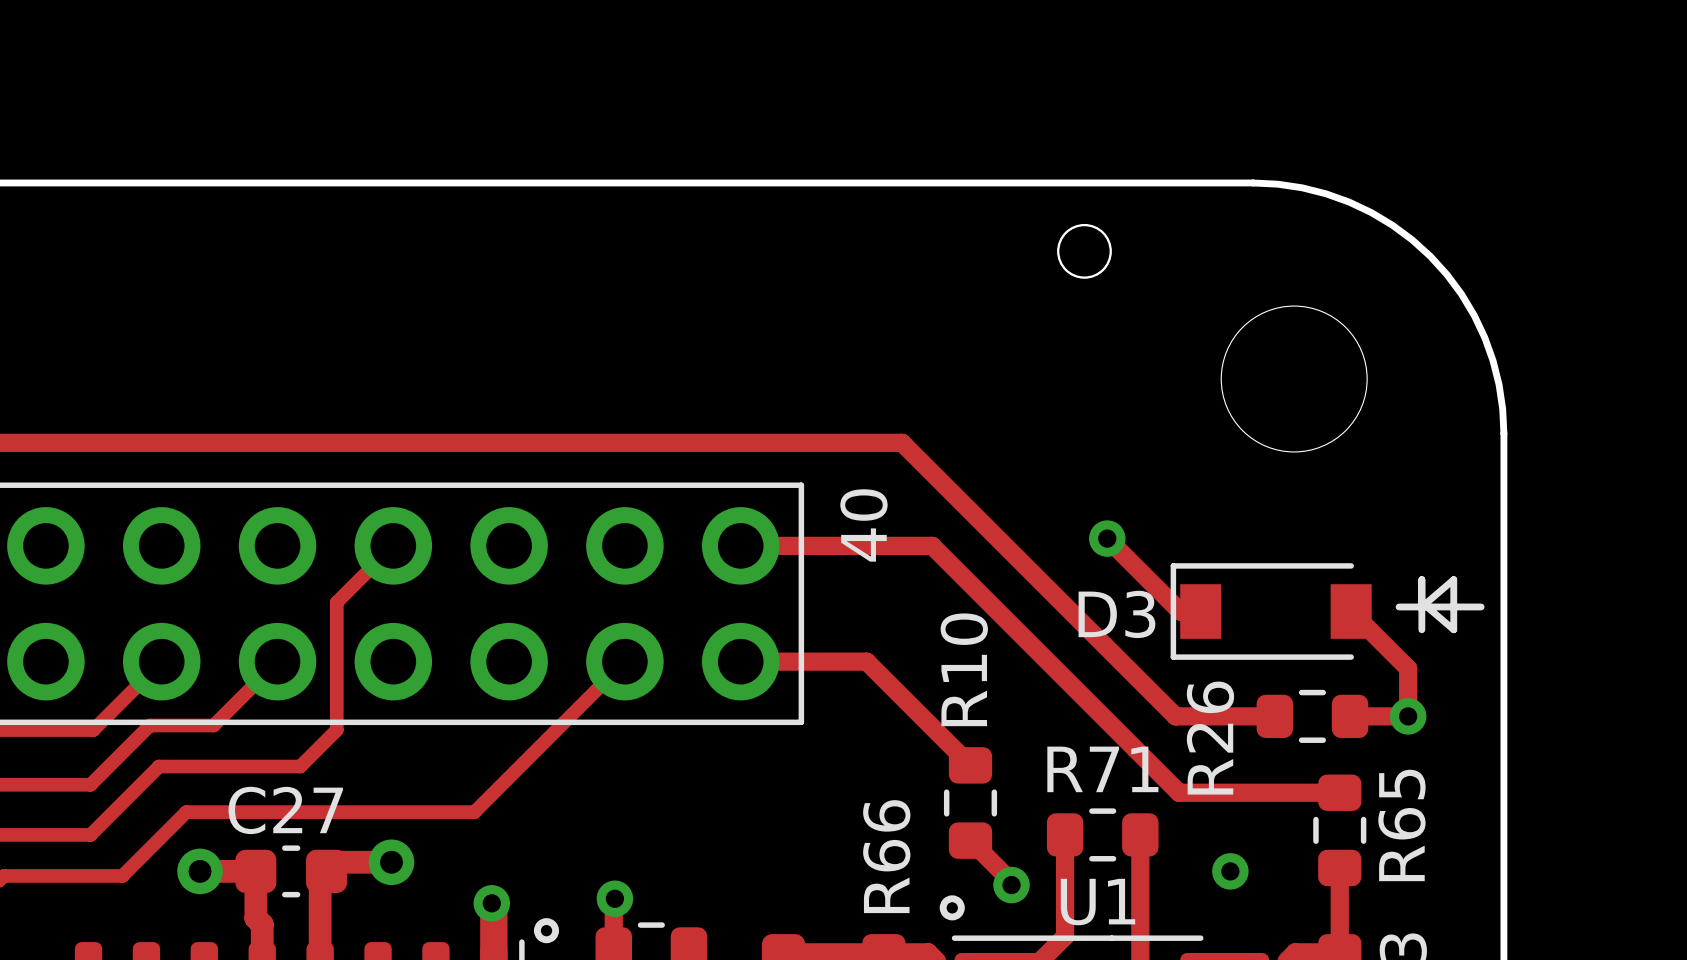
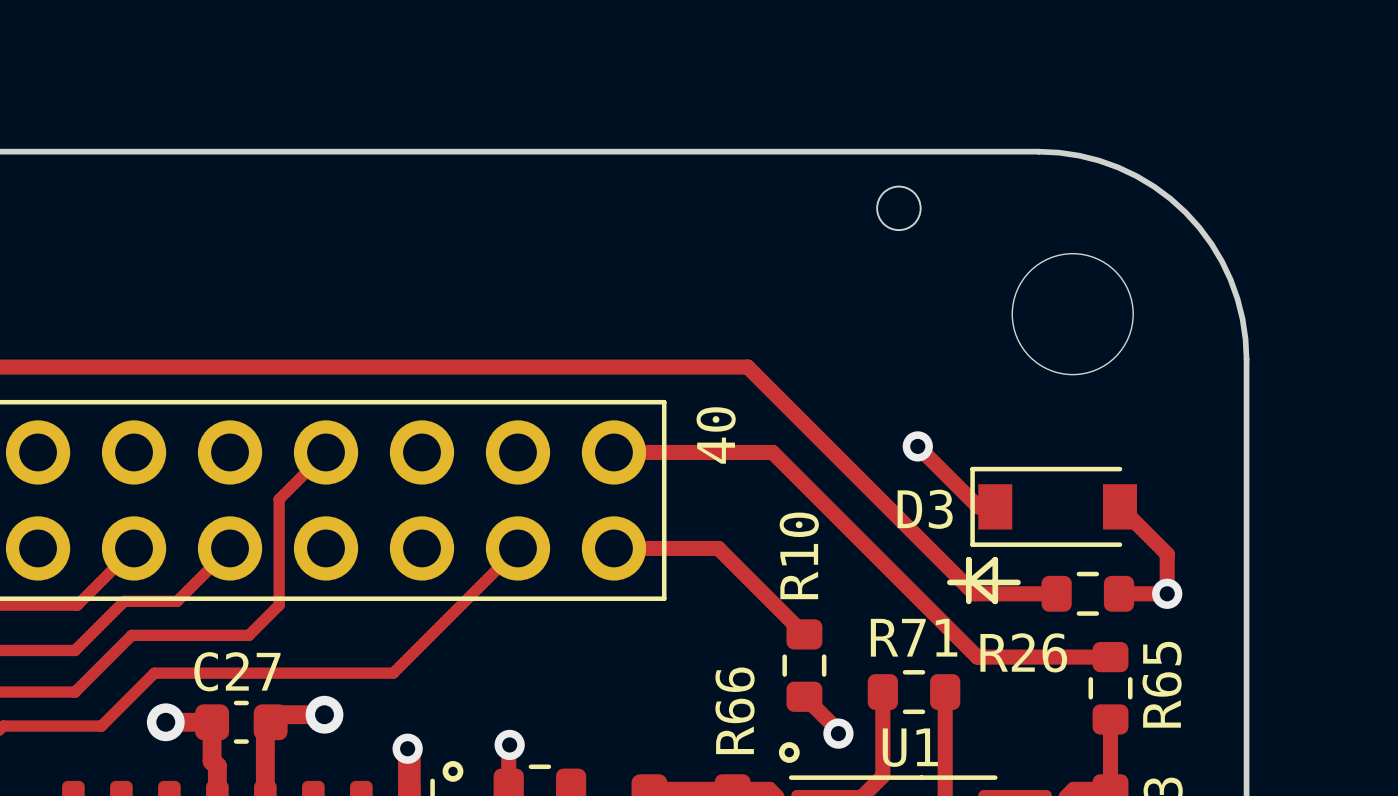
line: (1421, 579) (1421, 629) -> (968, 559) (968, 601)
line: (1421, 602) (1453, 629) (1453, 579) (1421, 606) -> (968, 578) (995, 601) (995, 559) (968, 582)
line: (1399, 606) (1481, 606) -> (949, 582) (1017, 582)
R26 name rotation: 0° (1210, 738) -> 90° clockwise (1023, 652)
via: (1230, 871) -> none

